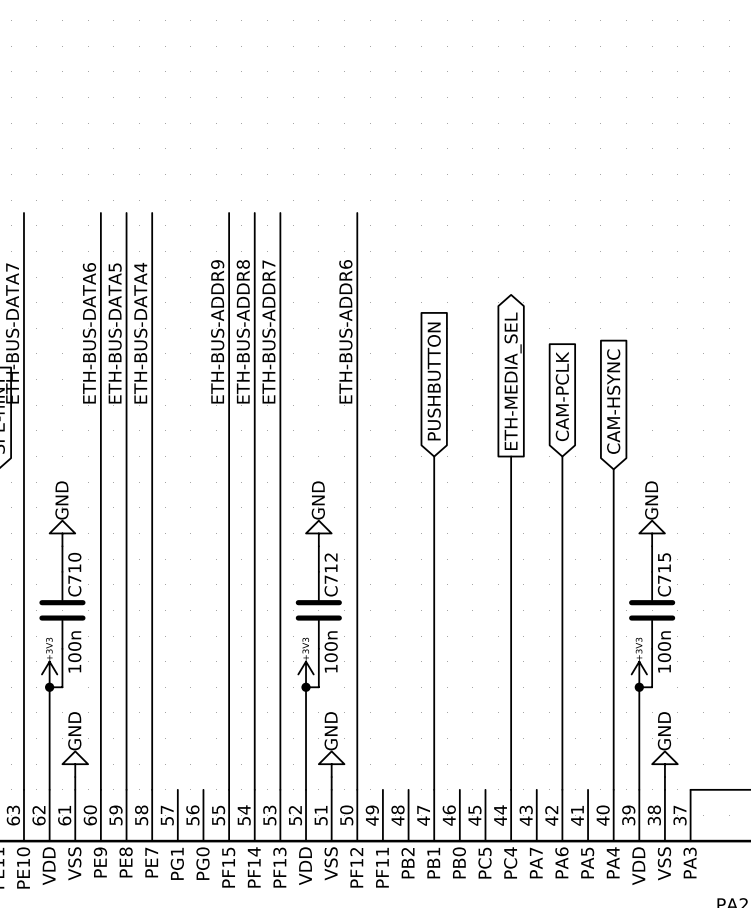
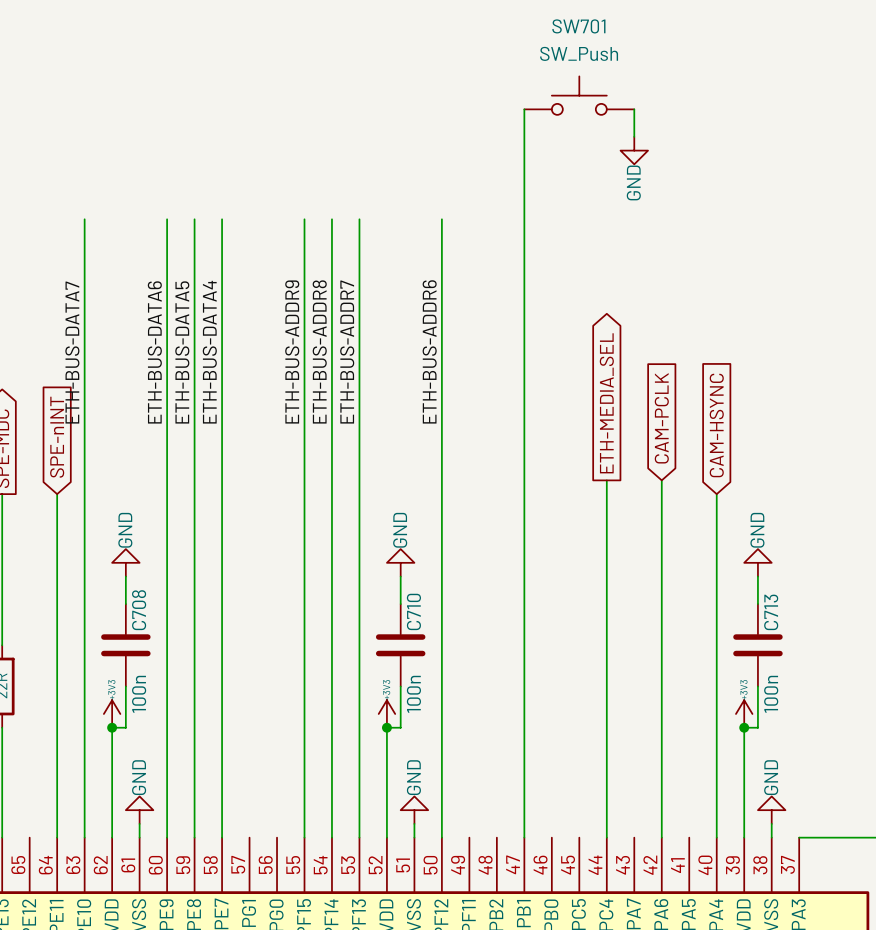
SW701: none -> SW_Push (579, 95)
wire: none -> (524, 109) (524, 480)
wire: none -> (634, 109) (634, 136)
power symbol: none -> GND (634, 150)
global label: PUSHBUTTON (434, 381) -> none
C710 name: C710 (74, 574) -> C708 (139, 610)
C715 name: C715 (664, 574) -> C713 (771, 612)
C712 name: C712 (331, 575) -> C710 (413, 611)

